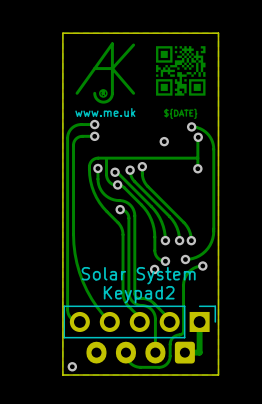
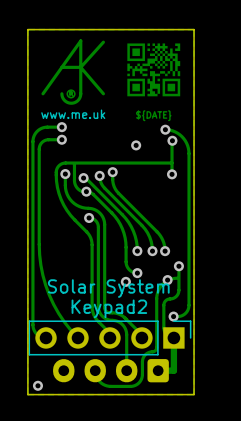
track: (213, 231) (211, 242) (205, 251) (196, 257) (185, 259) -> (189, 241) (188, 308) (183, 315) (173, 316)
track: none -> (178, 266) (178, 293) (174, 297) (166, 300) (163, 304) (164, 330) (167, 335) (173, 337)
via: none -> (178, 266)
via: (185, 259) -> none
via: (202, 266) -> none
via: none -> (167, 280)
via: none -> (173, 316)

